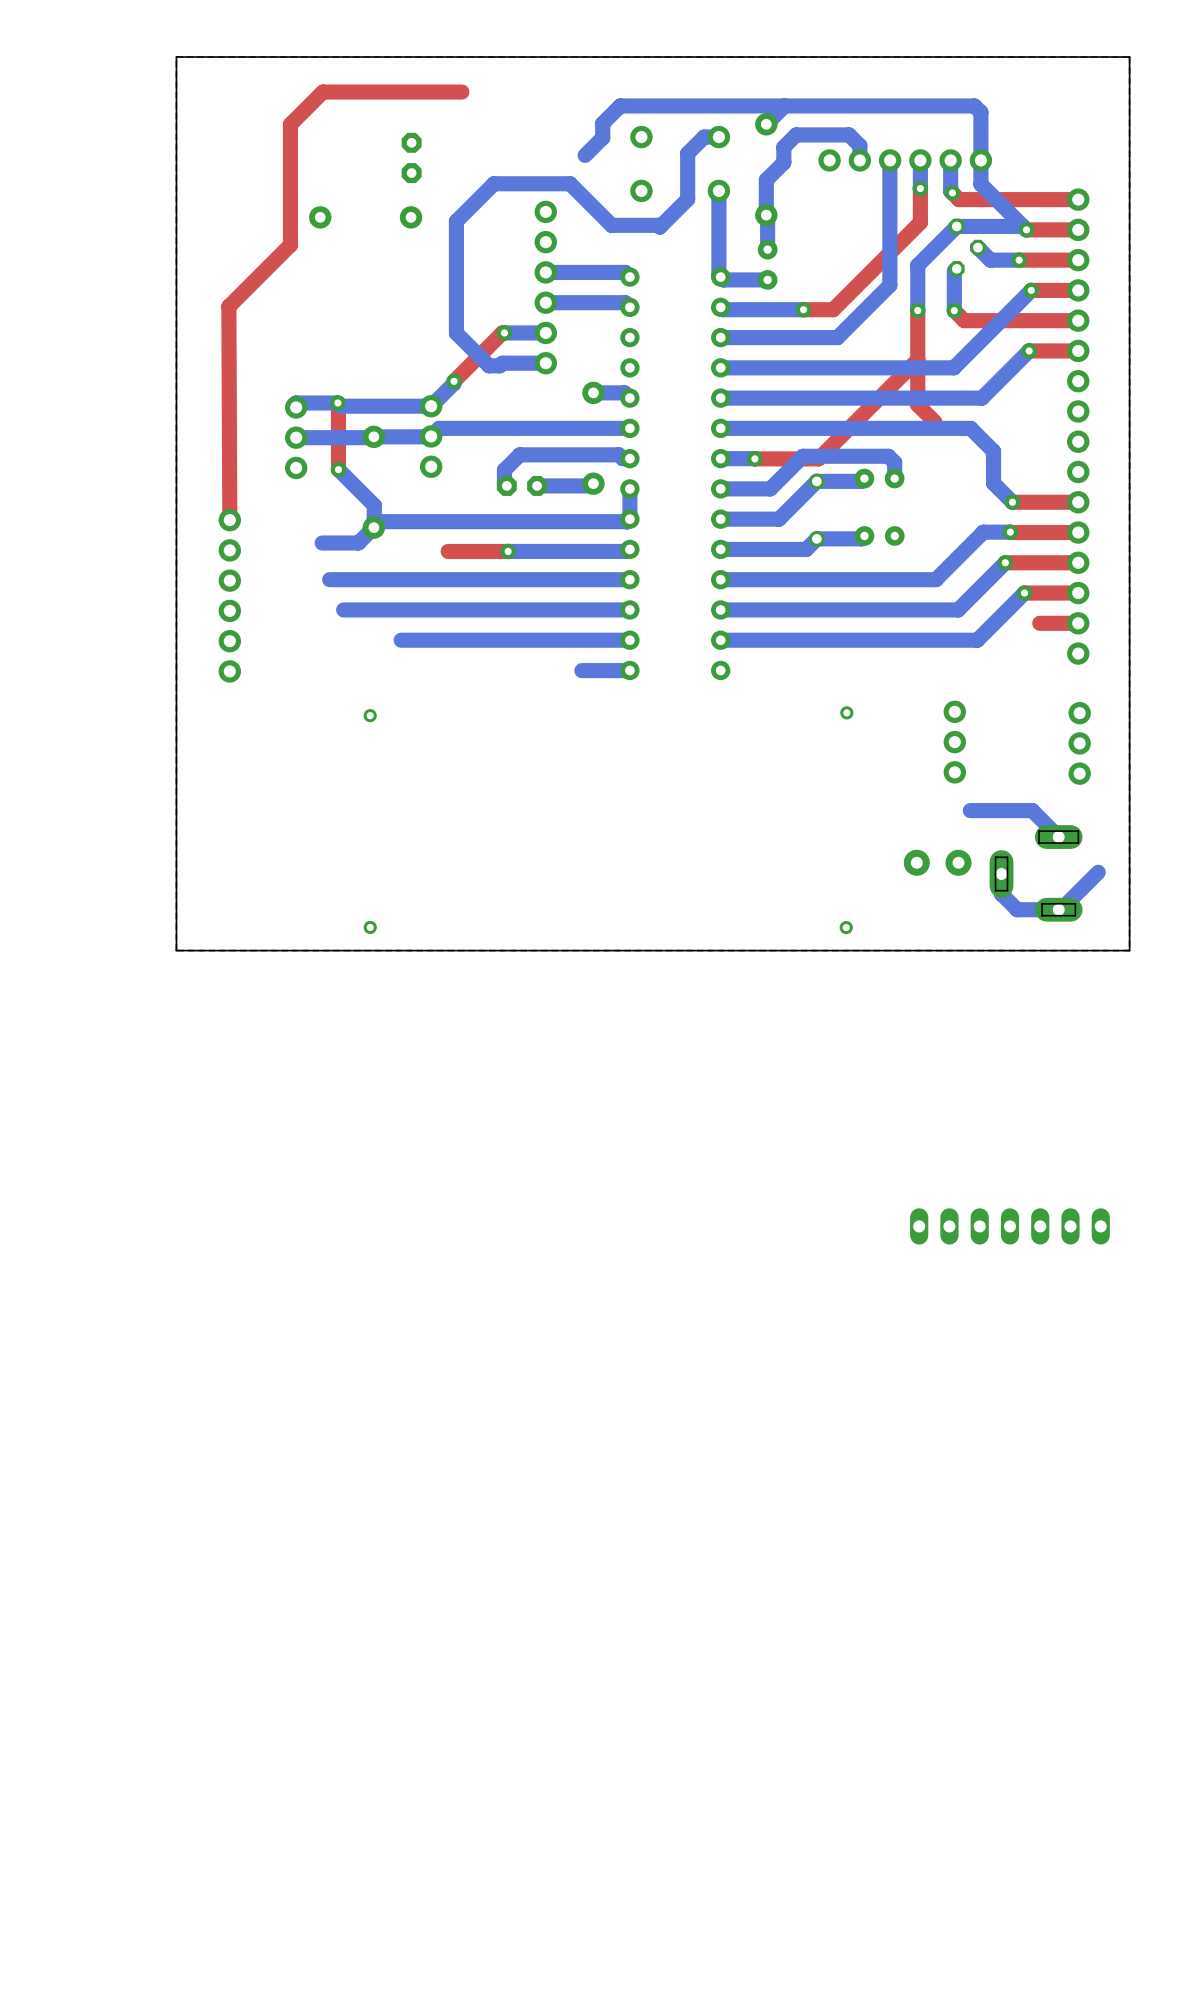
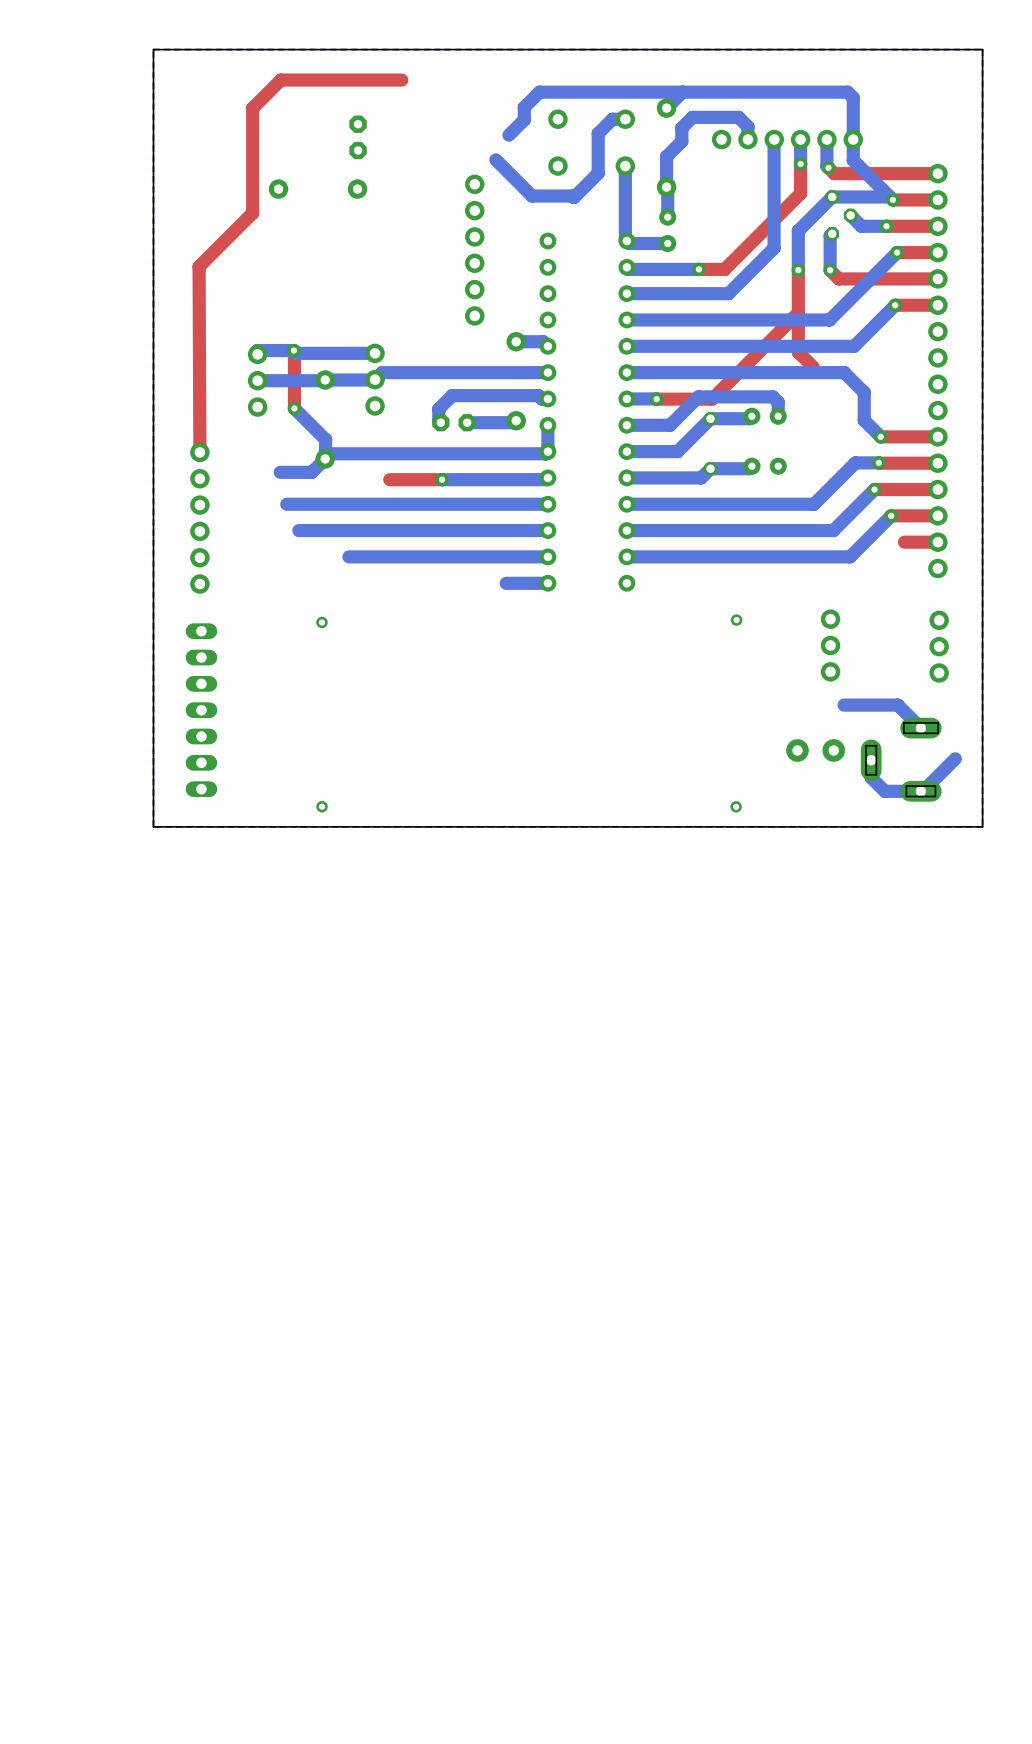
bottom track: (570, 183) (493, 183) (456, 221) (456, 333) (489, 365) (499, 365) (502, 363) (545, 363) -> none
bottom track: (545, 272) (625, 272) (629, 277) -> none
bottom track: (545, 302) (625, 302) (629, 307) -> none
top track: (504, 332) (454, 381) -> none
via: (504, 332) -> none
bottom track: (545, 332) (504, 332) -> none
bottom track: (454, 381) (431, 406) -> none
via: (454, 381) -> none
part: none -> (201, 710)
part: (1009, 1226) -> none

